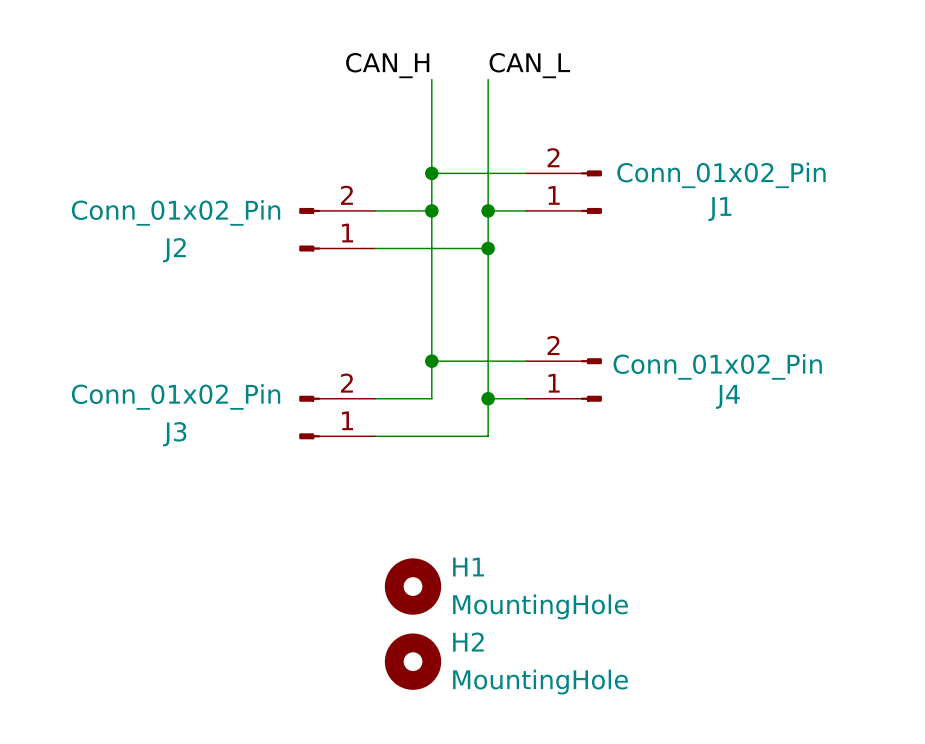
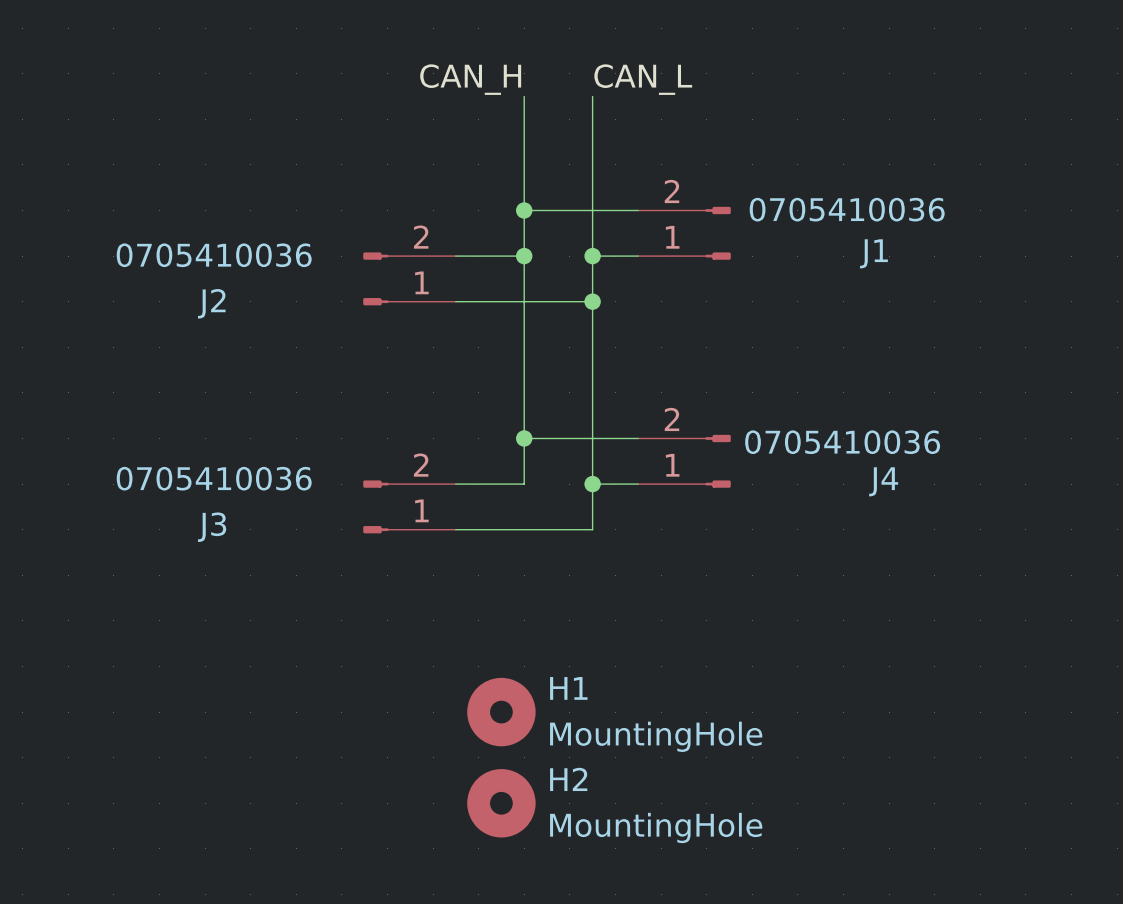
J1 value: Conn_01x02_Pin (721, 175) -> 0705410036 (847, 209)
J2 value: Conn_01x02_Pin (176, 212) -> 0705410036 (214, 255)
J4 value: Conn_01x02_Pin (717, 366) -> 0705410036 (842, 442)
J3 value: Conn_01x02_Pin (176, 396) -> 0705410036 (214, 478)

